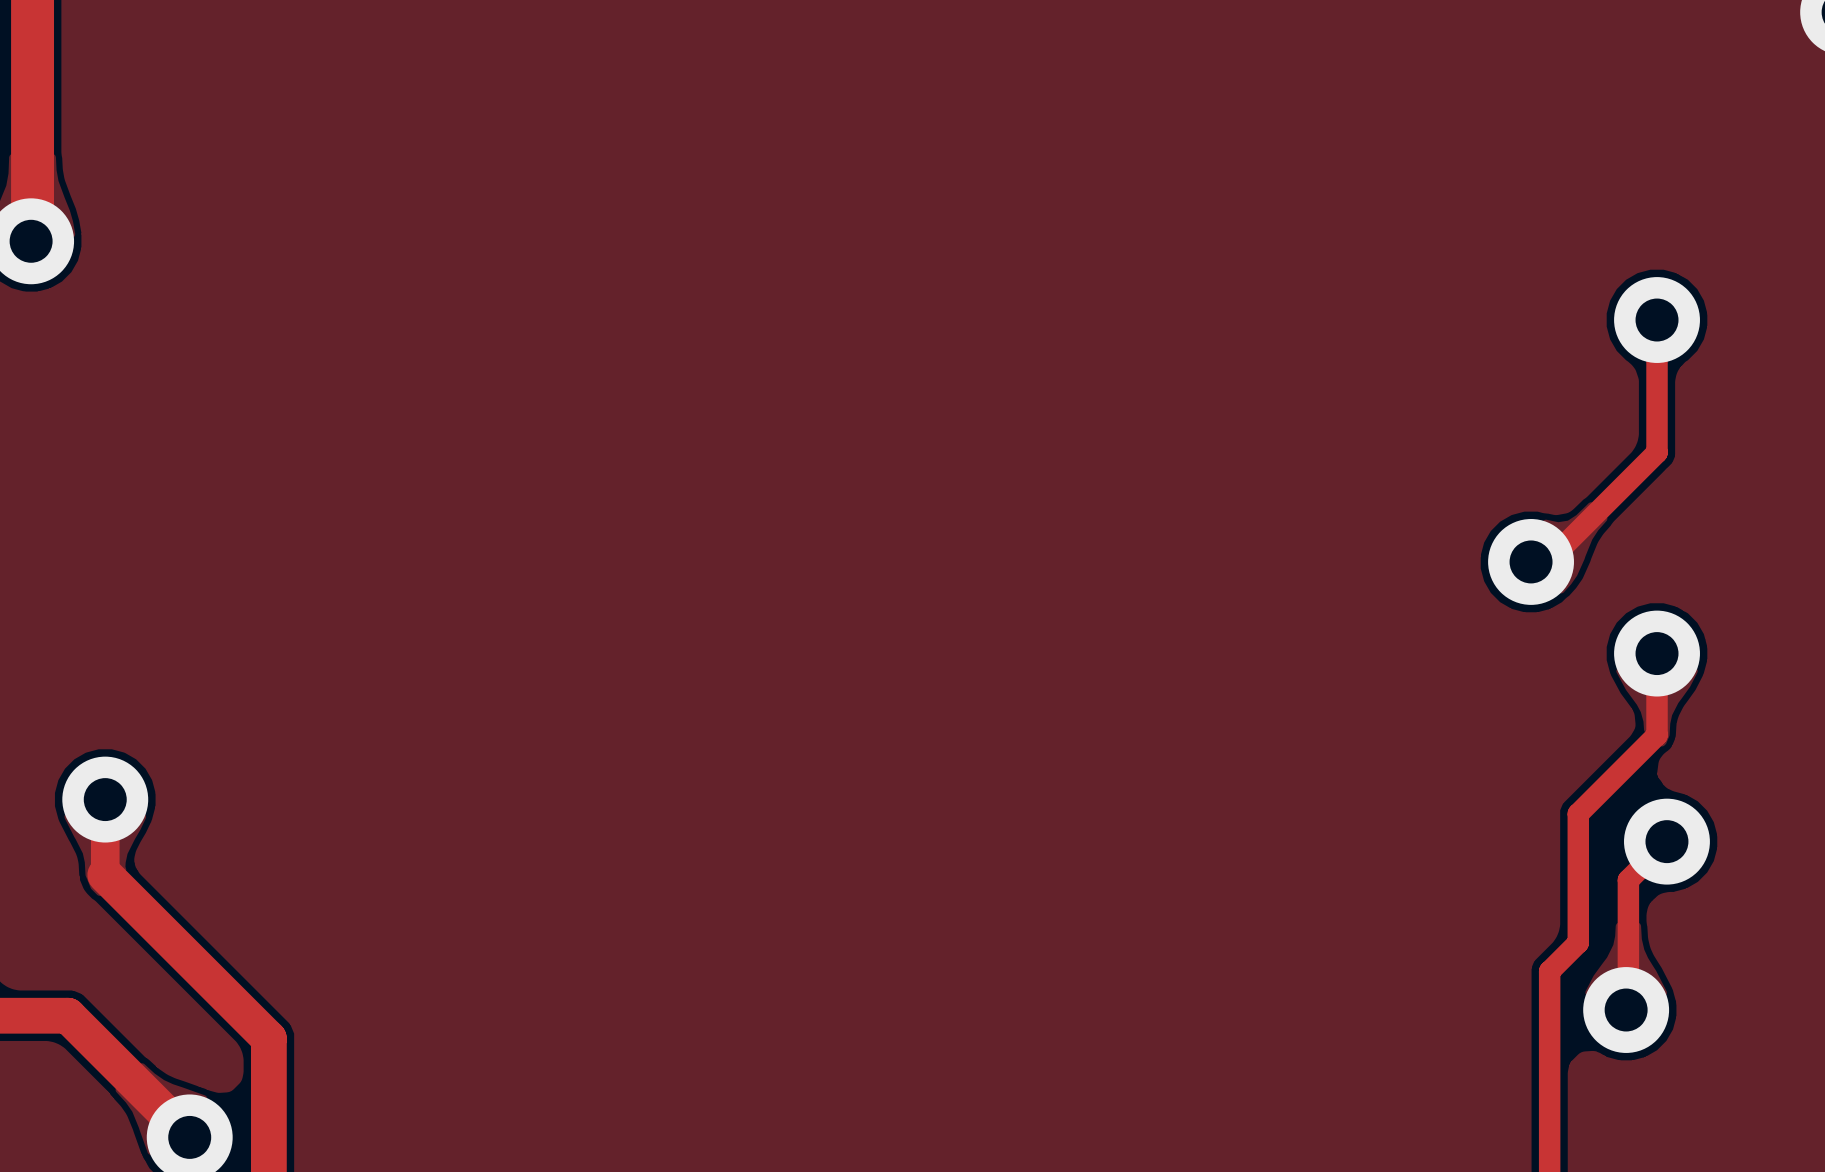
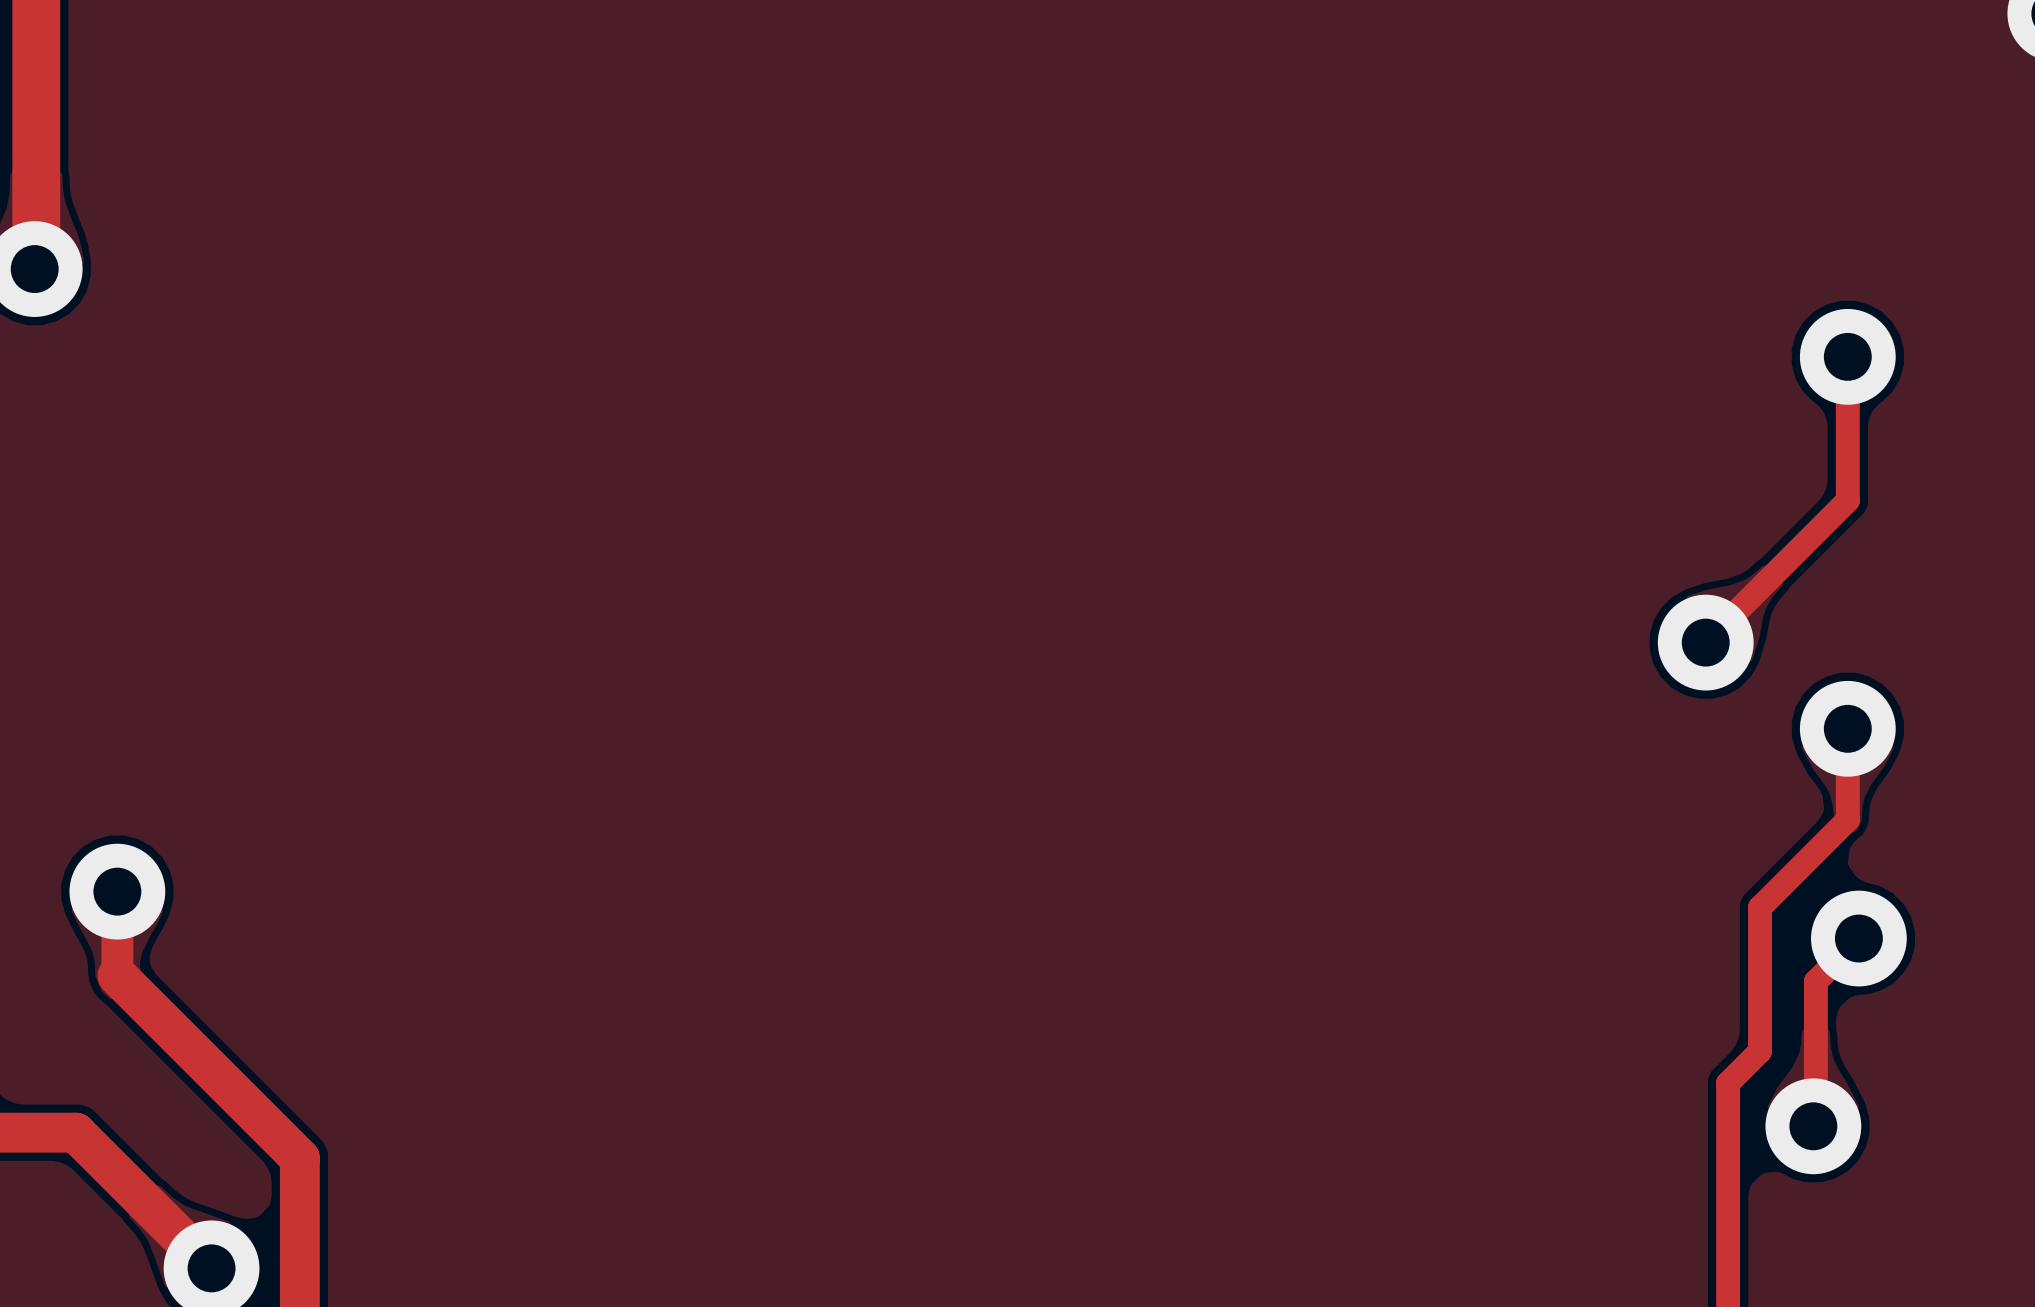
track: (1657, 448) (1657, 452) (1547, 561) (1531, 561) -> (1847, 500) (1705, 642)
via position: (1531, 561) -> (1705, 642)

